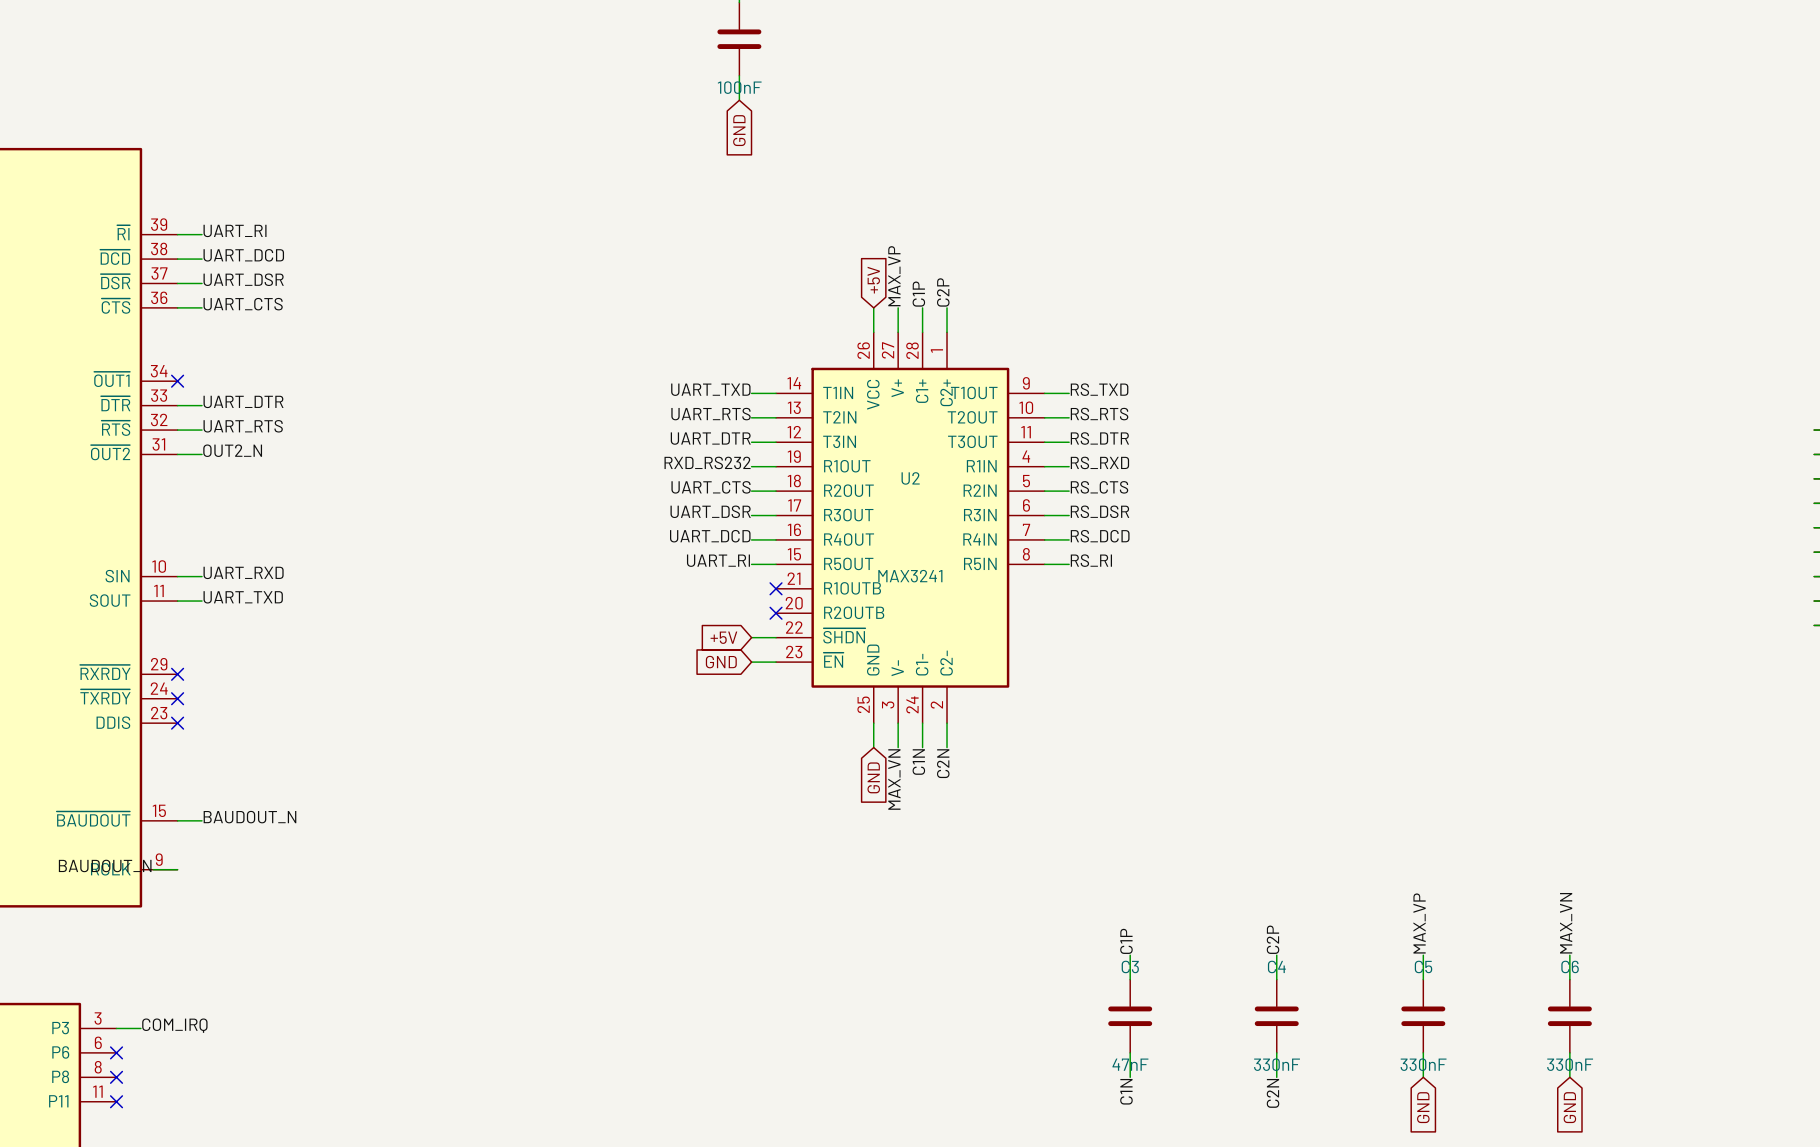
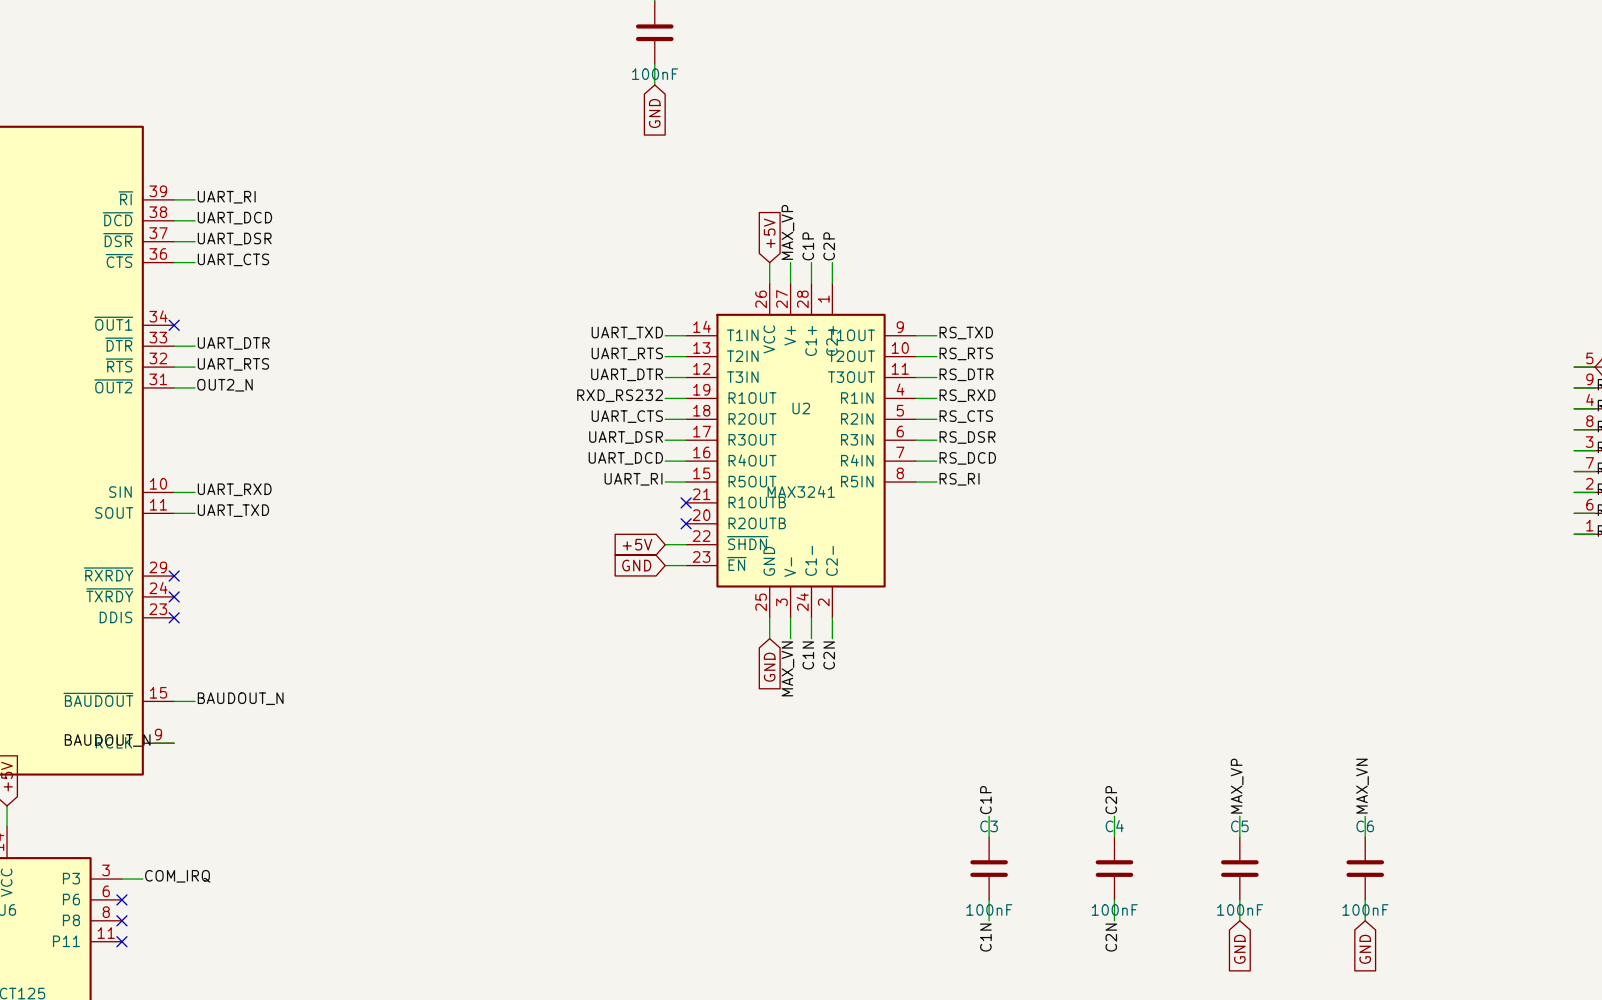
C3 value: 47nF (1130, 1064) -> 100nF (989, 909)
C4 value: 330nF (1277, 1064) -> 100nF (1114, 909)
C5 value: 330nF (1423, 1064) -> 100nF (1240, 909)
C6 value: 330nF (1570, 1064) -> 100nF (1365, 909)

